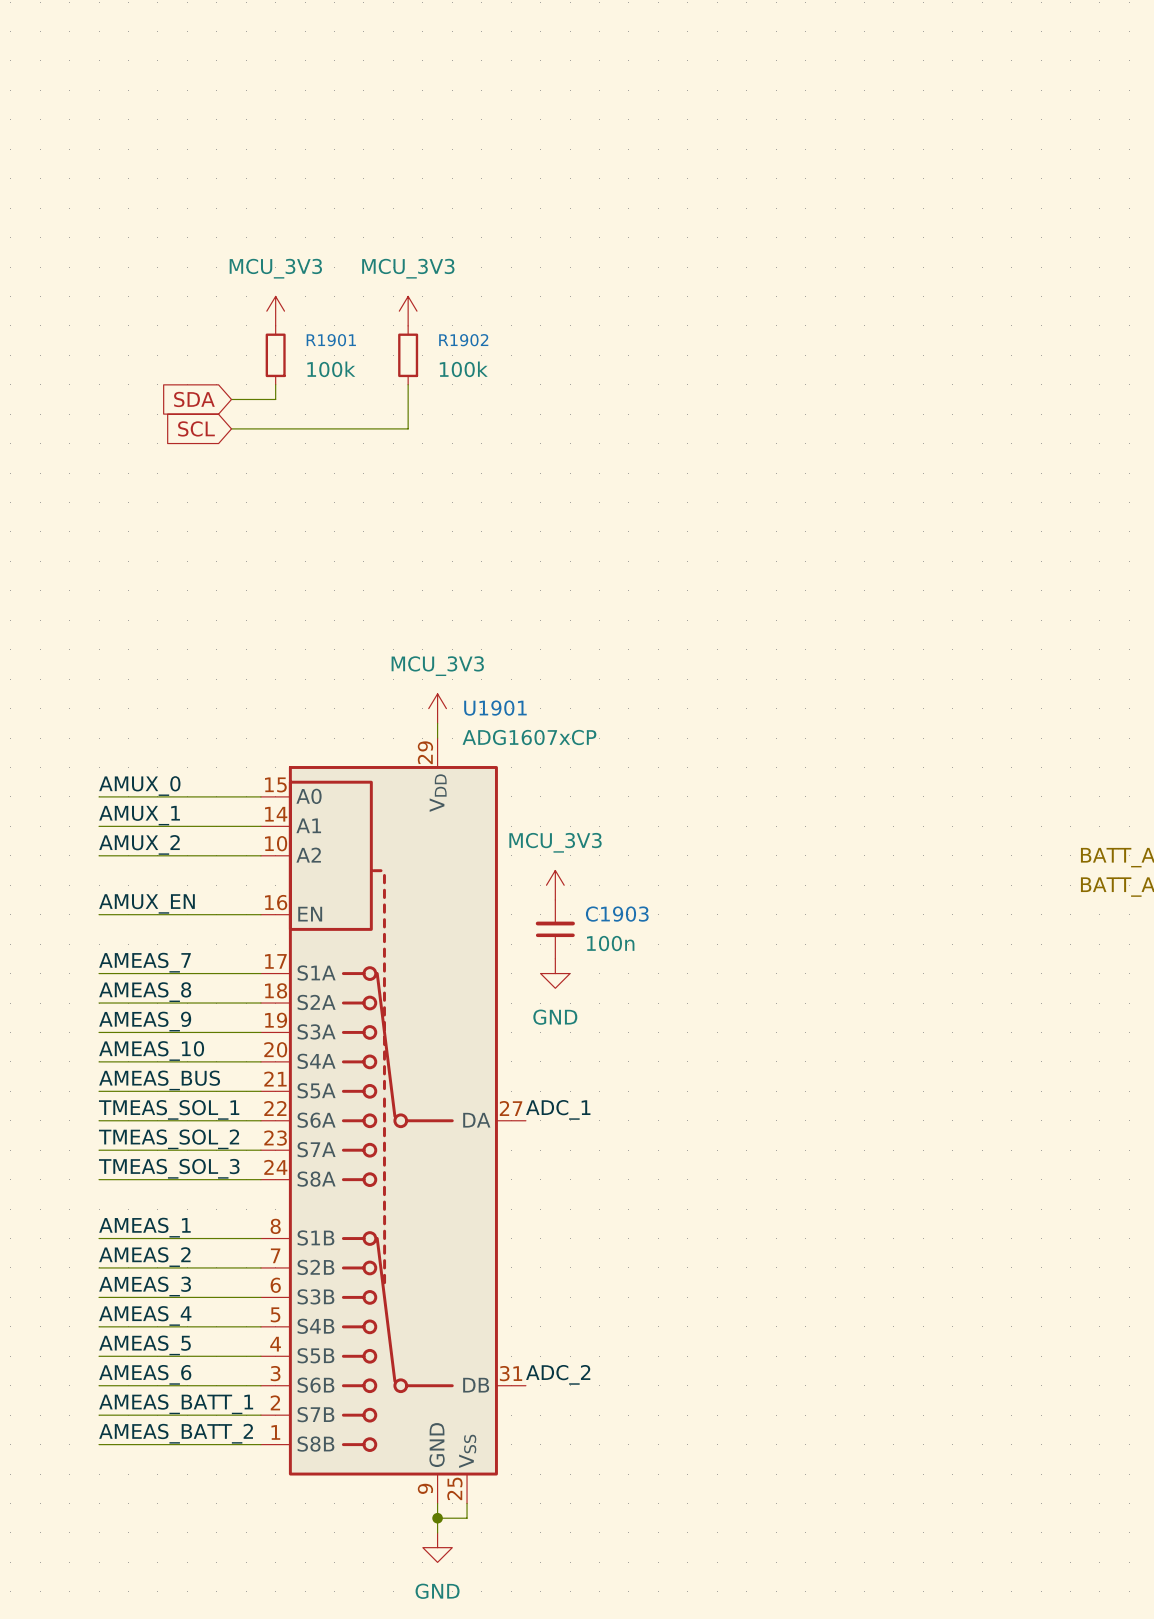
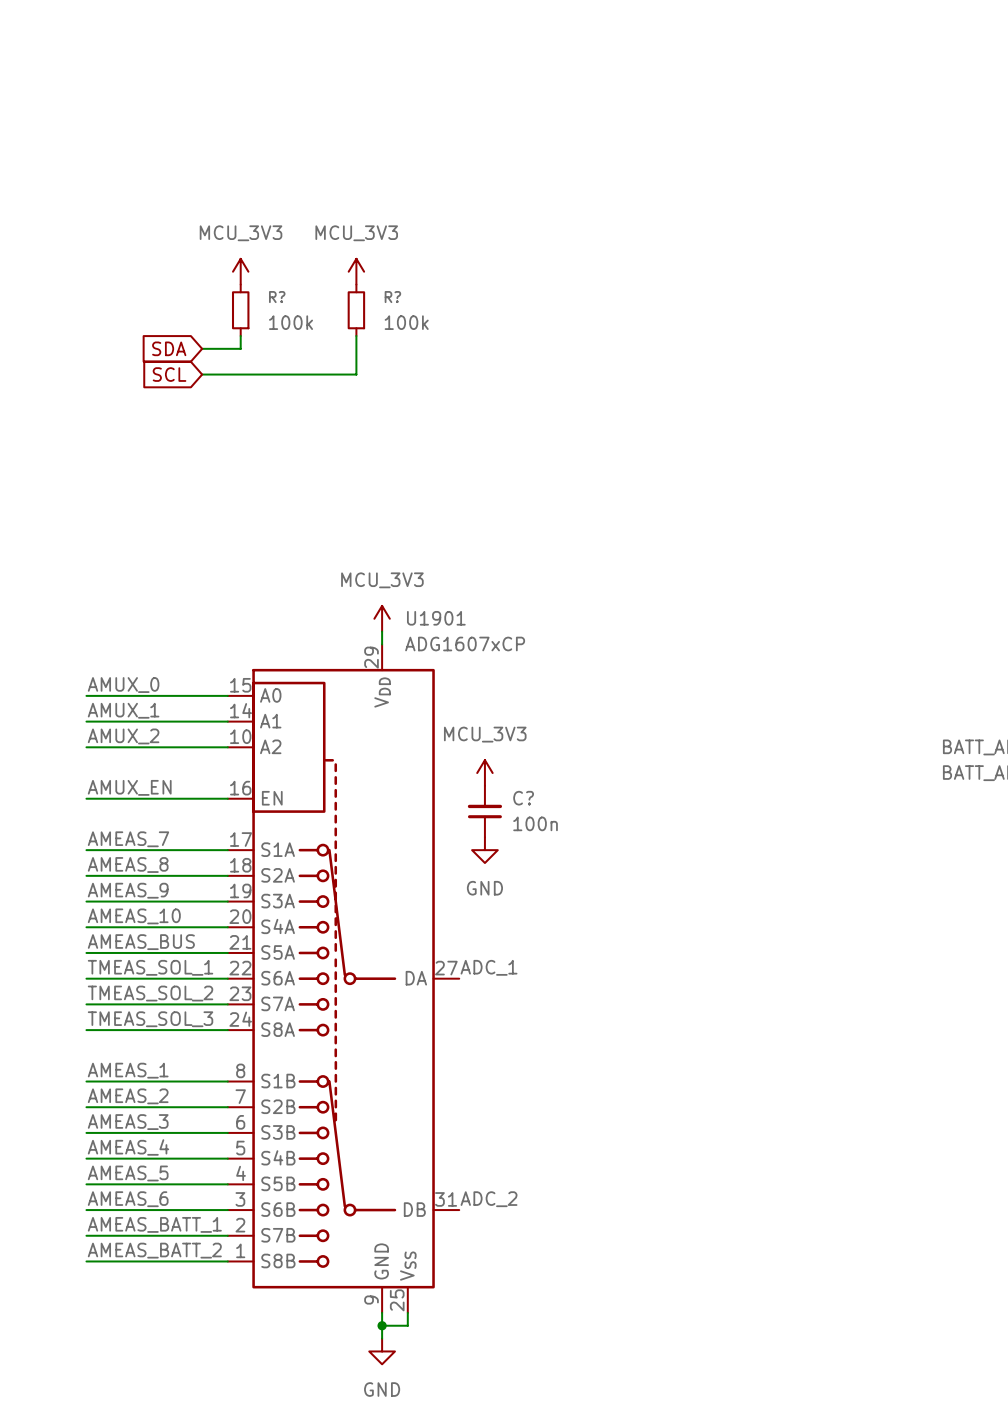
R1901 name: R1901 (331, 340) -> R? (277, 297)
R1902 name: R1902 (463, 340) -> R? (392, 297)
C1903 name: C1903 (617, 914) -> C? (523, 798)

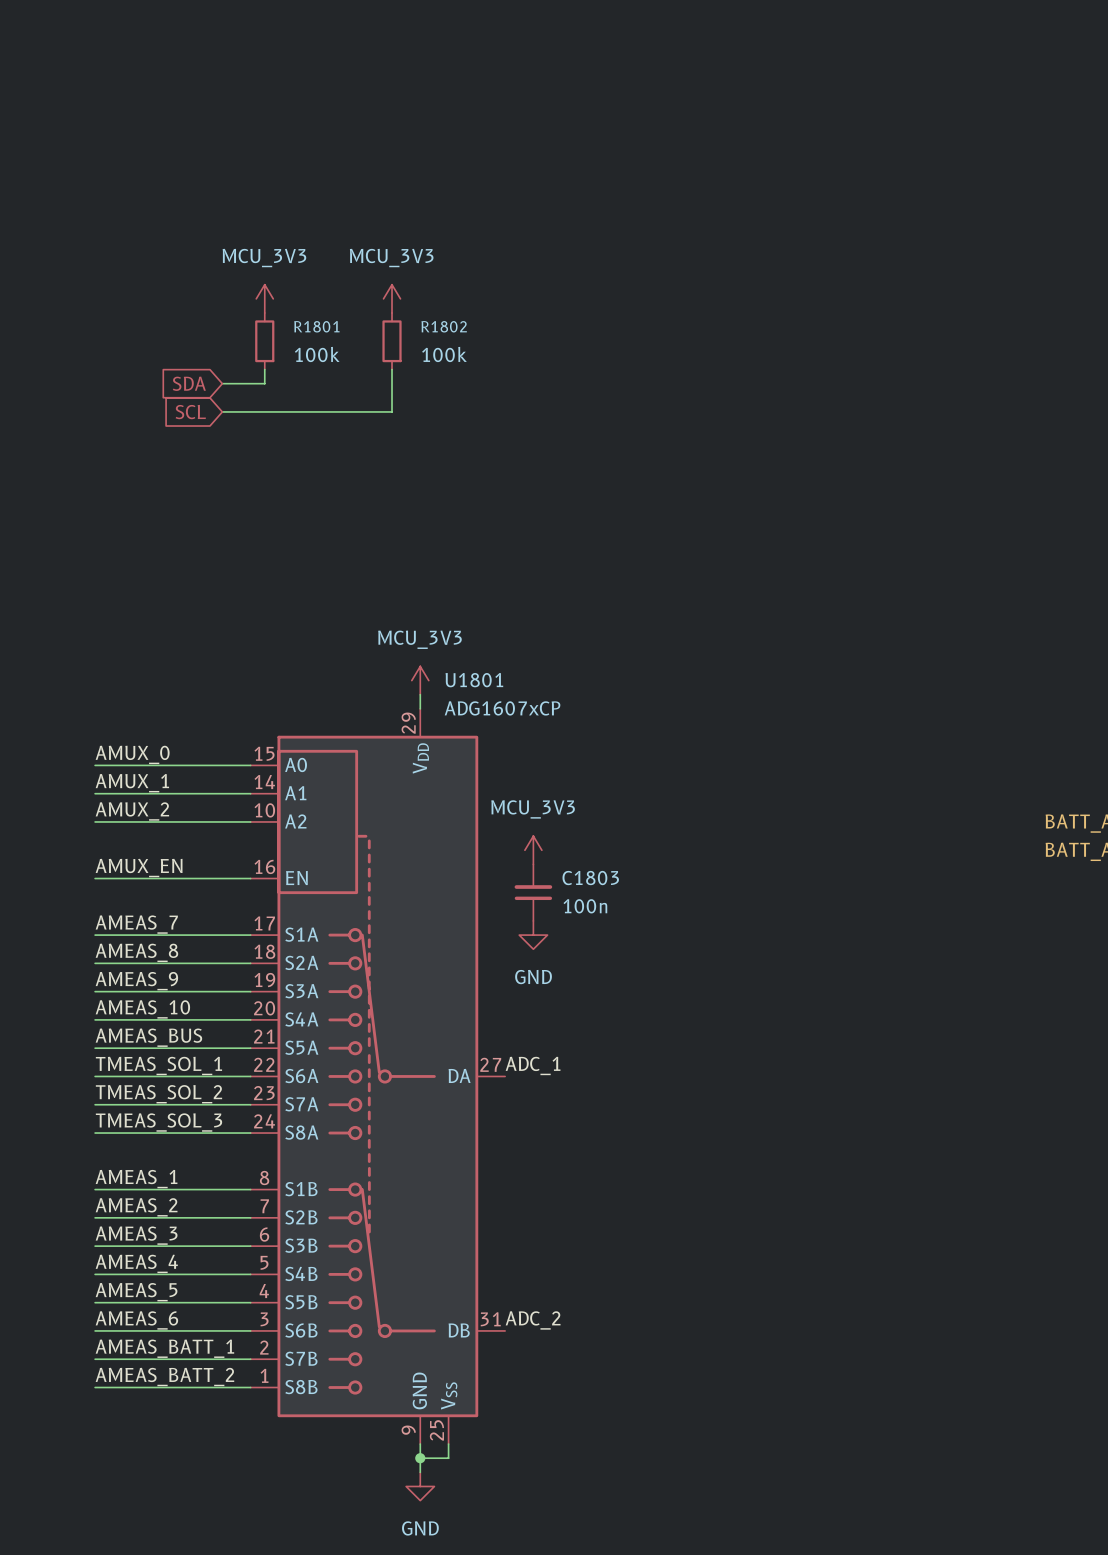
R? name: R? (277, 297) -> R1801 (316, 326)
R? name: R? (392, 297) -> R1802 (444, 326)
U1901 name: U1901 (436, 618) -> U1801 (474, 680)
C? name: C? (523, 798) -> C1803 (590, 878)

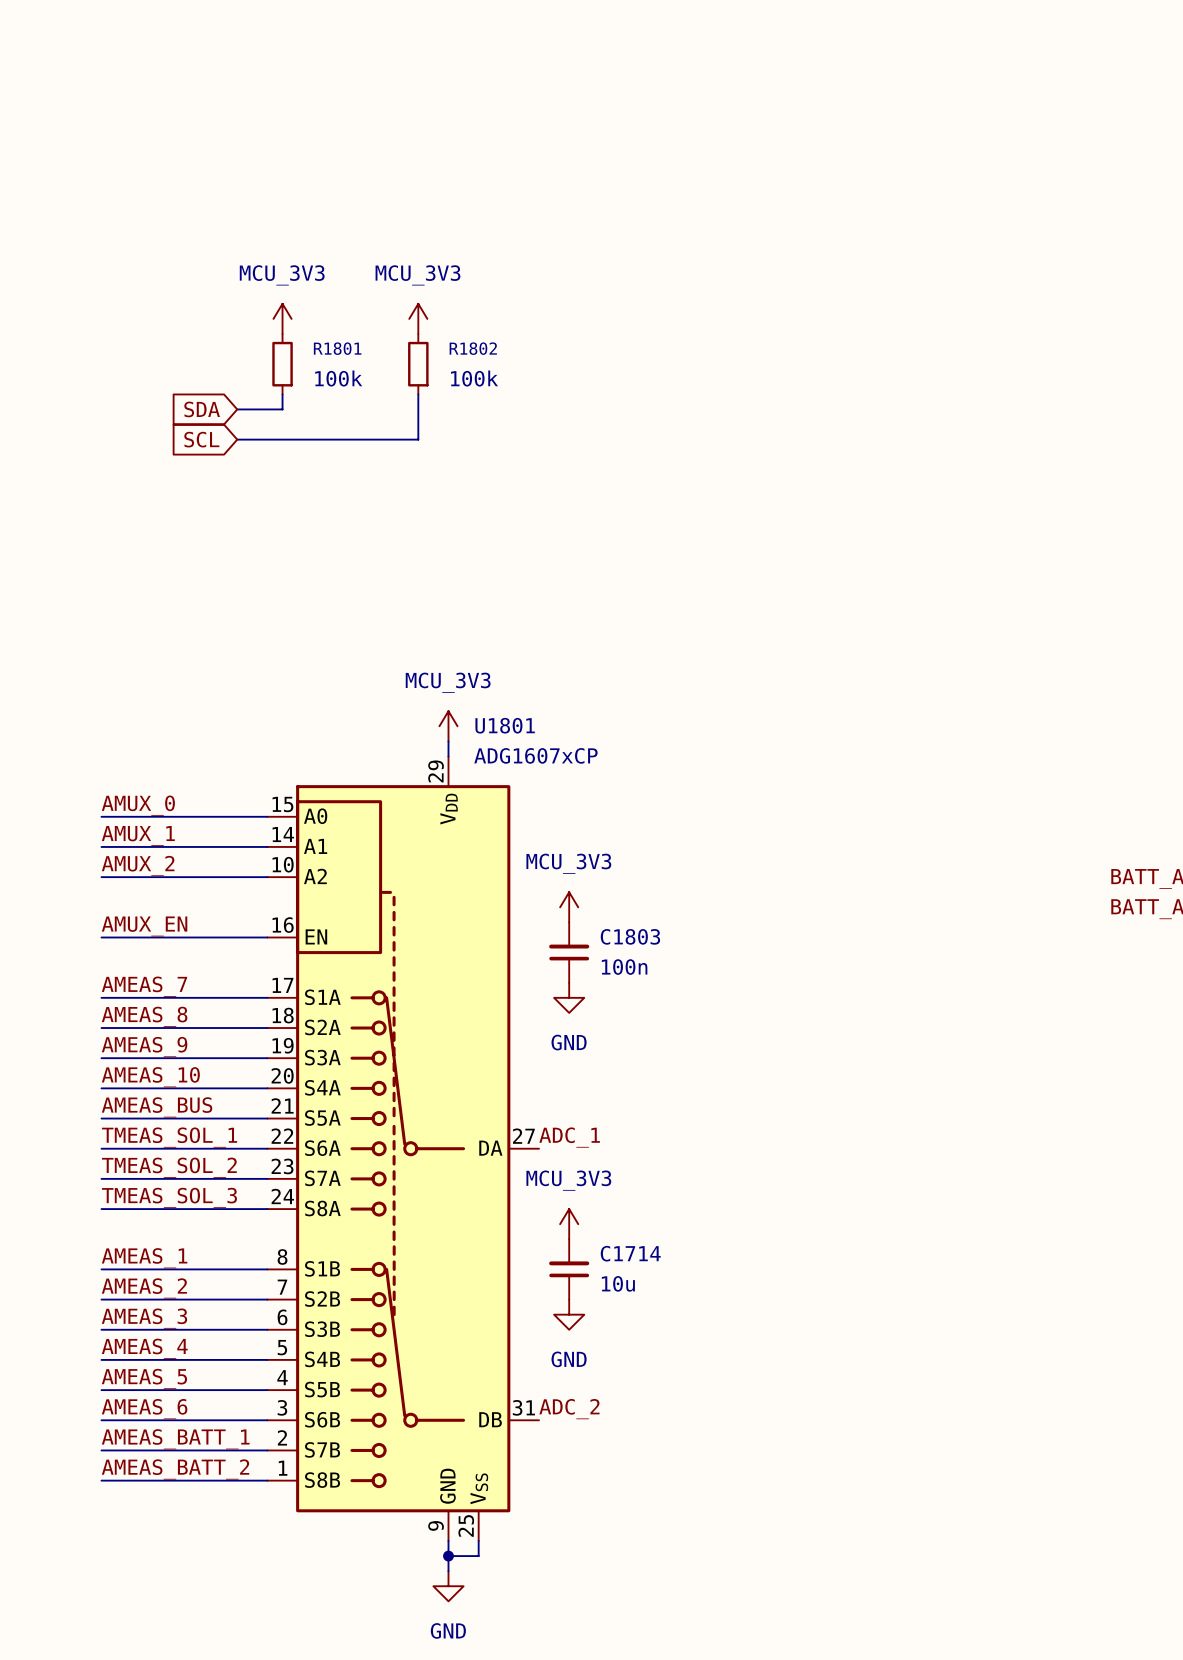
power symbol: none -> MCU_3V3 (569, 1224)
C1714: none -> 10u (569, 1269)
power symbol: none -> GND (569, 1314)

